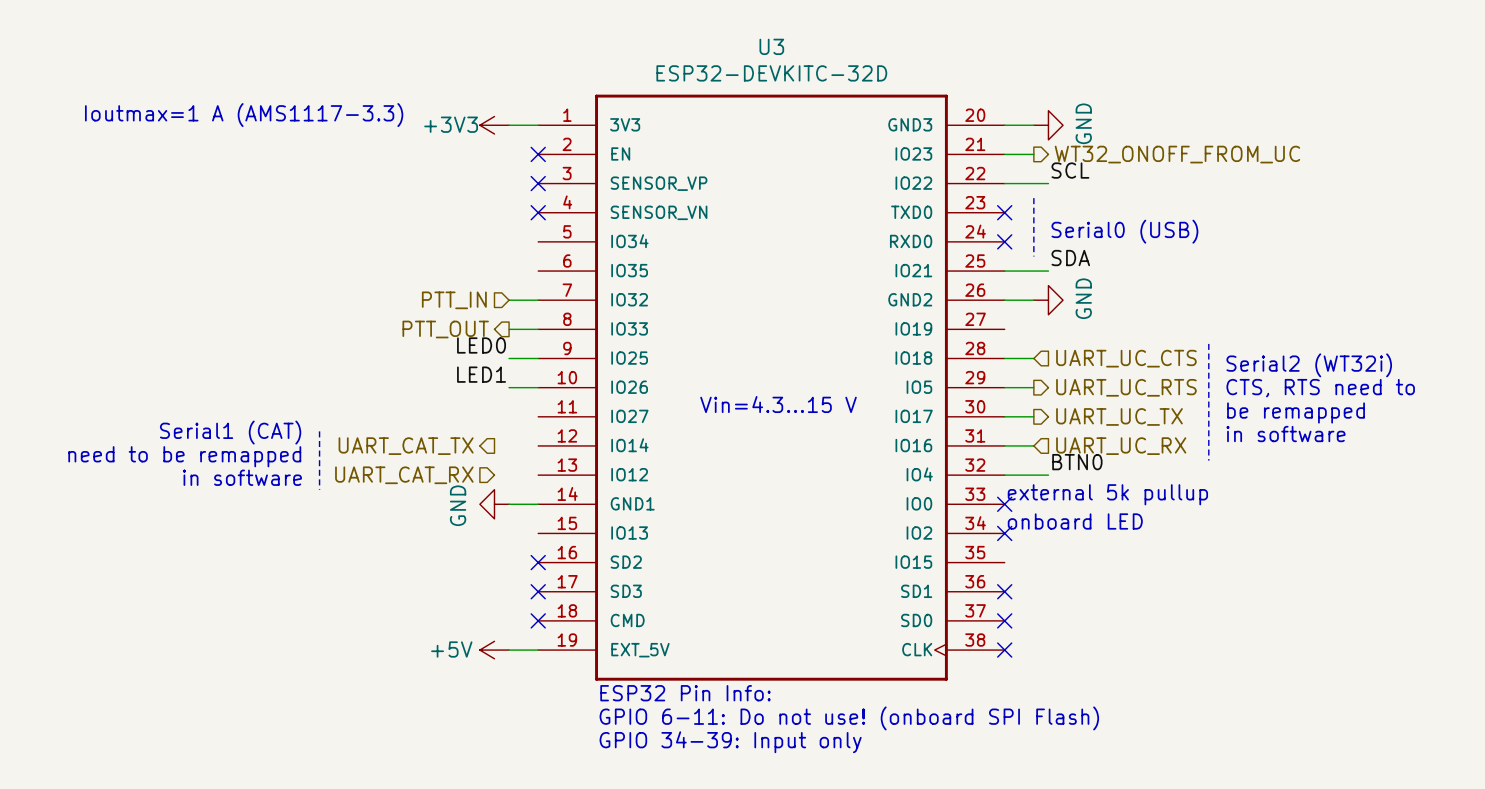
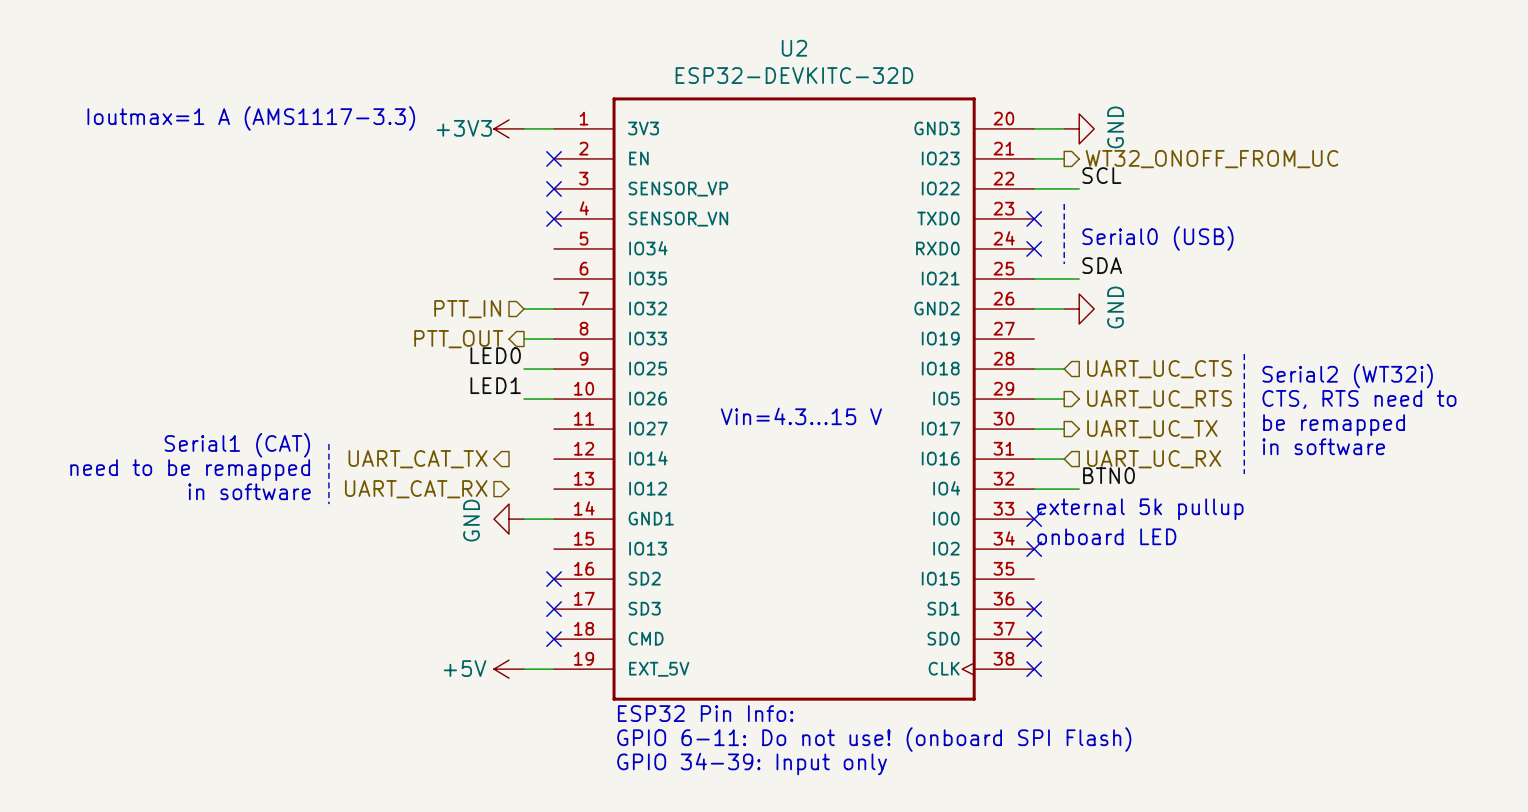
U3 name: U3 (771, 46) -> U2 (794, 48)

